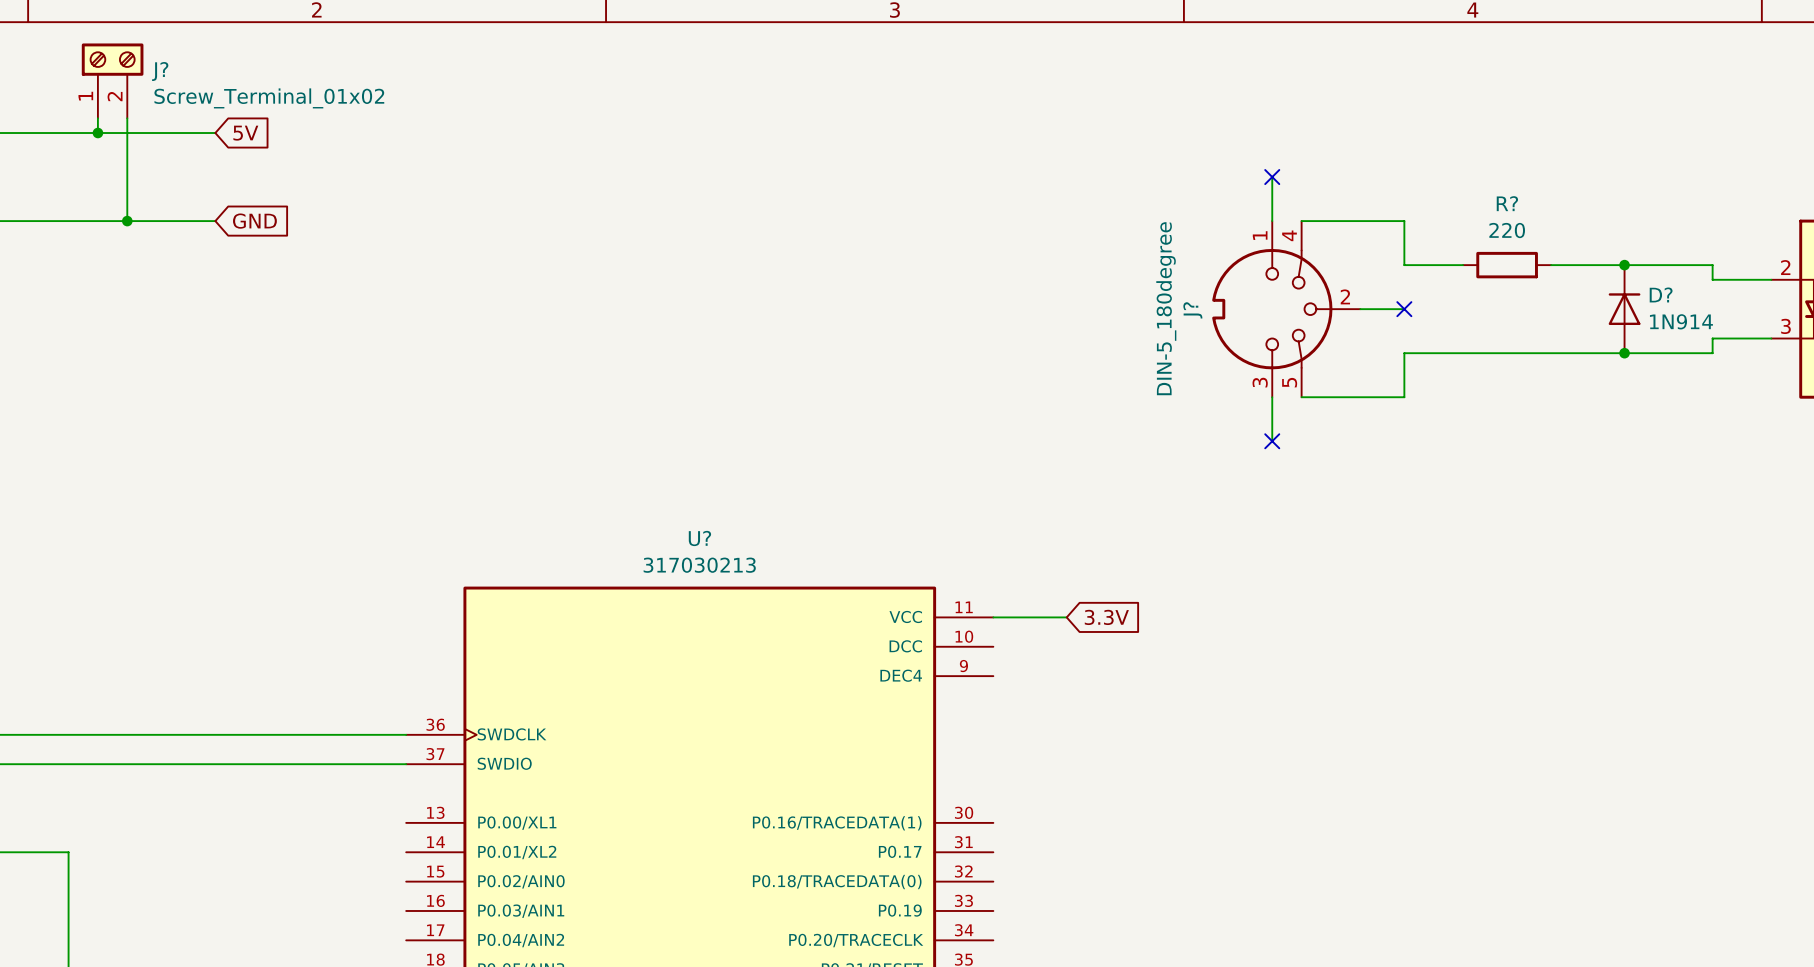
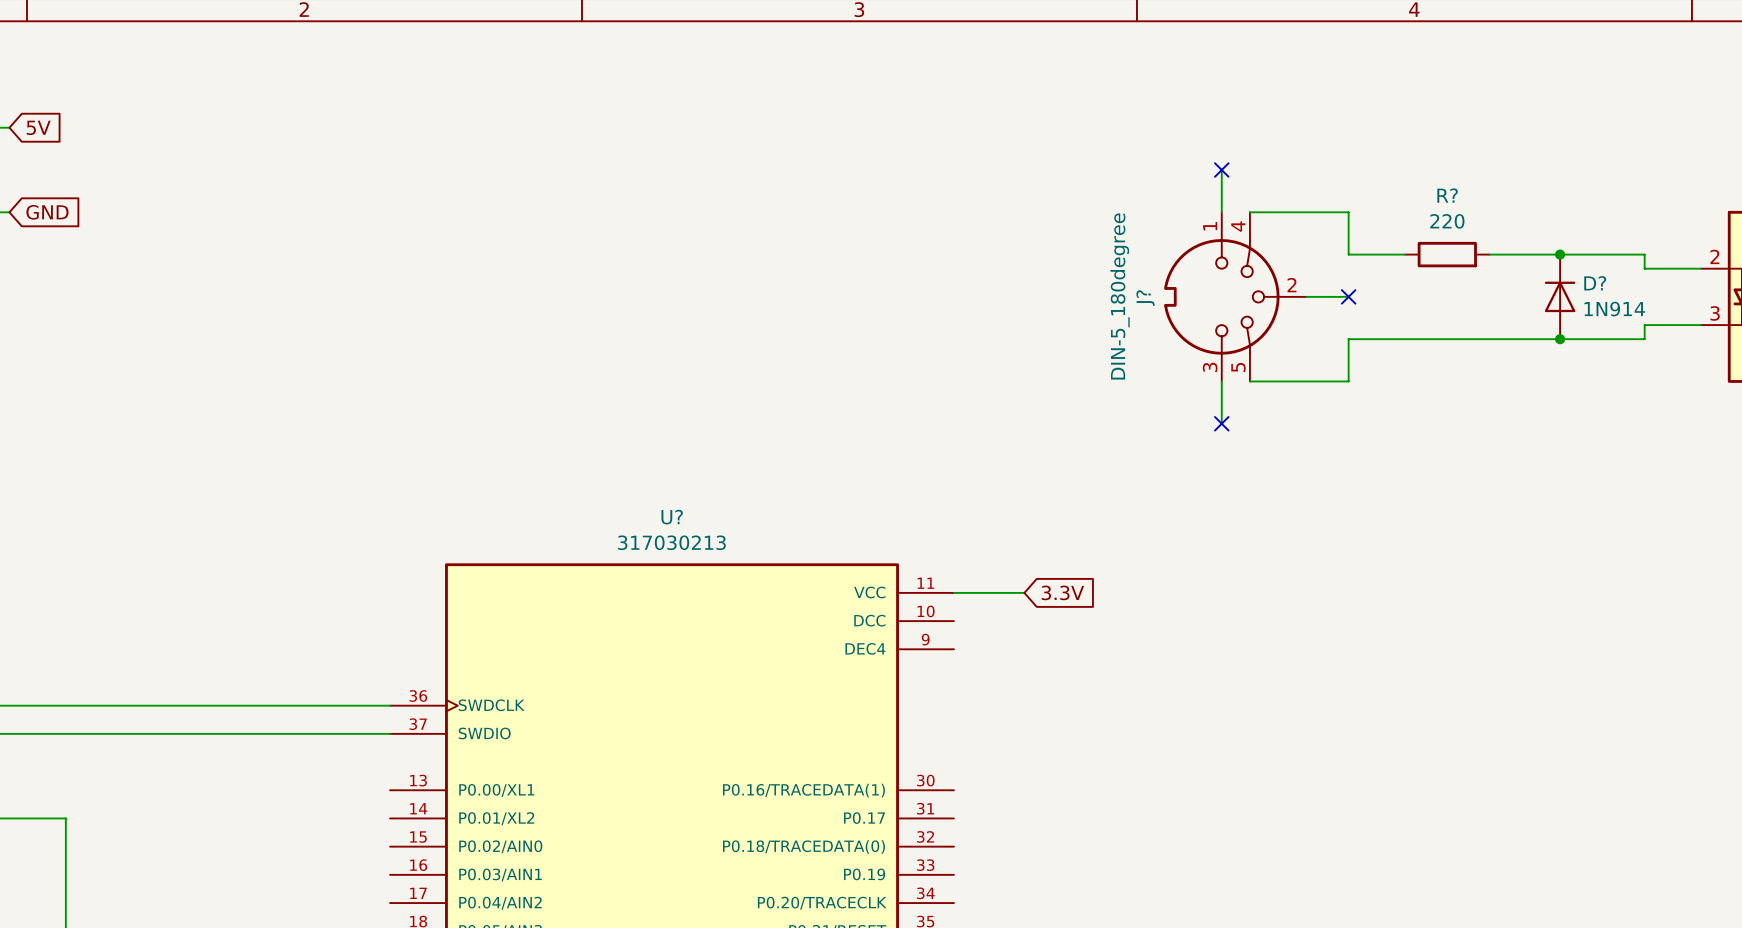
J?: Screw_Terminal_01x02 (112, 80) -> none
wire: (97, 118) (97, 133) -> none
wire: (127, 118) (127, 221) -> none
wire: (9, 133) (215, 133) -> none
junction: (97, 133) -> none
global label position: 5V (245, 133) -> 5V (38, 127)
wire: (9, 221) (215, 221) -> none
junction: (127, 221) -> none
global label position: GND (254, 221) -> GND (47, 212)

